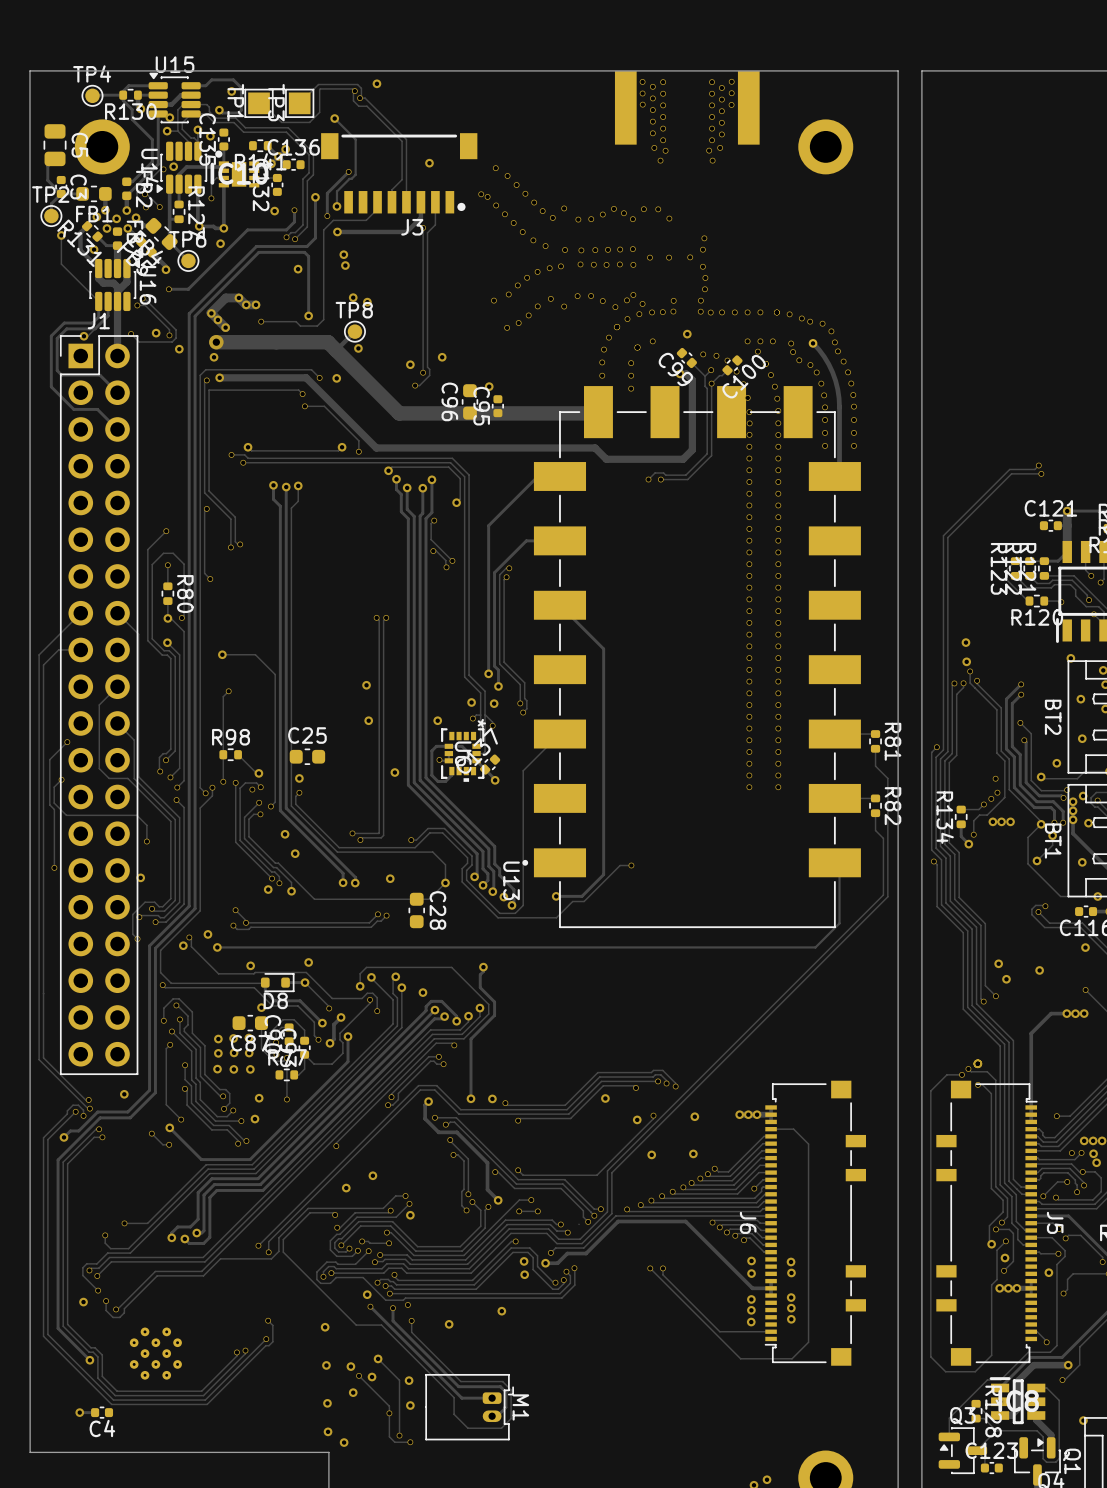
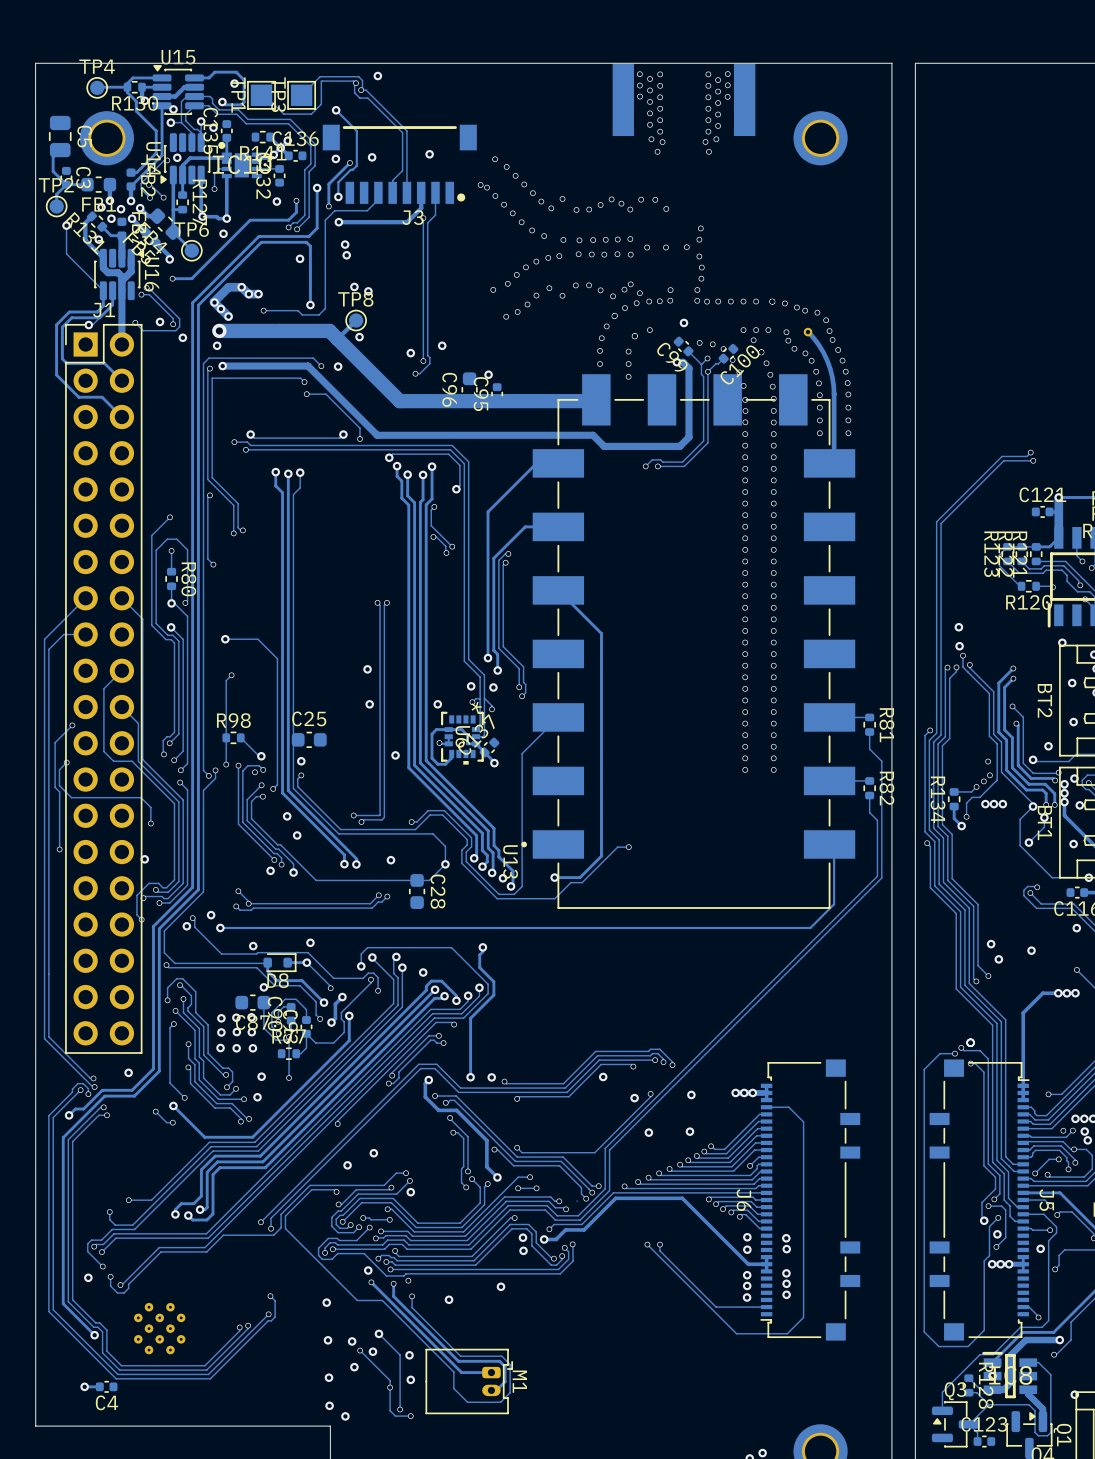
via: none -> (372, 157)
via: none -> (335, 158)

